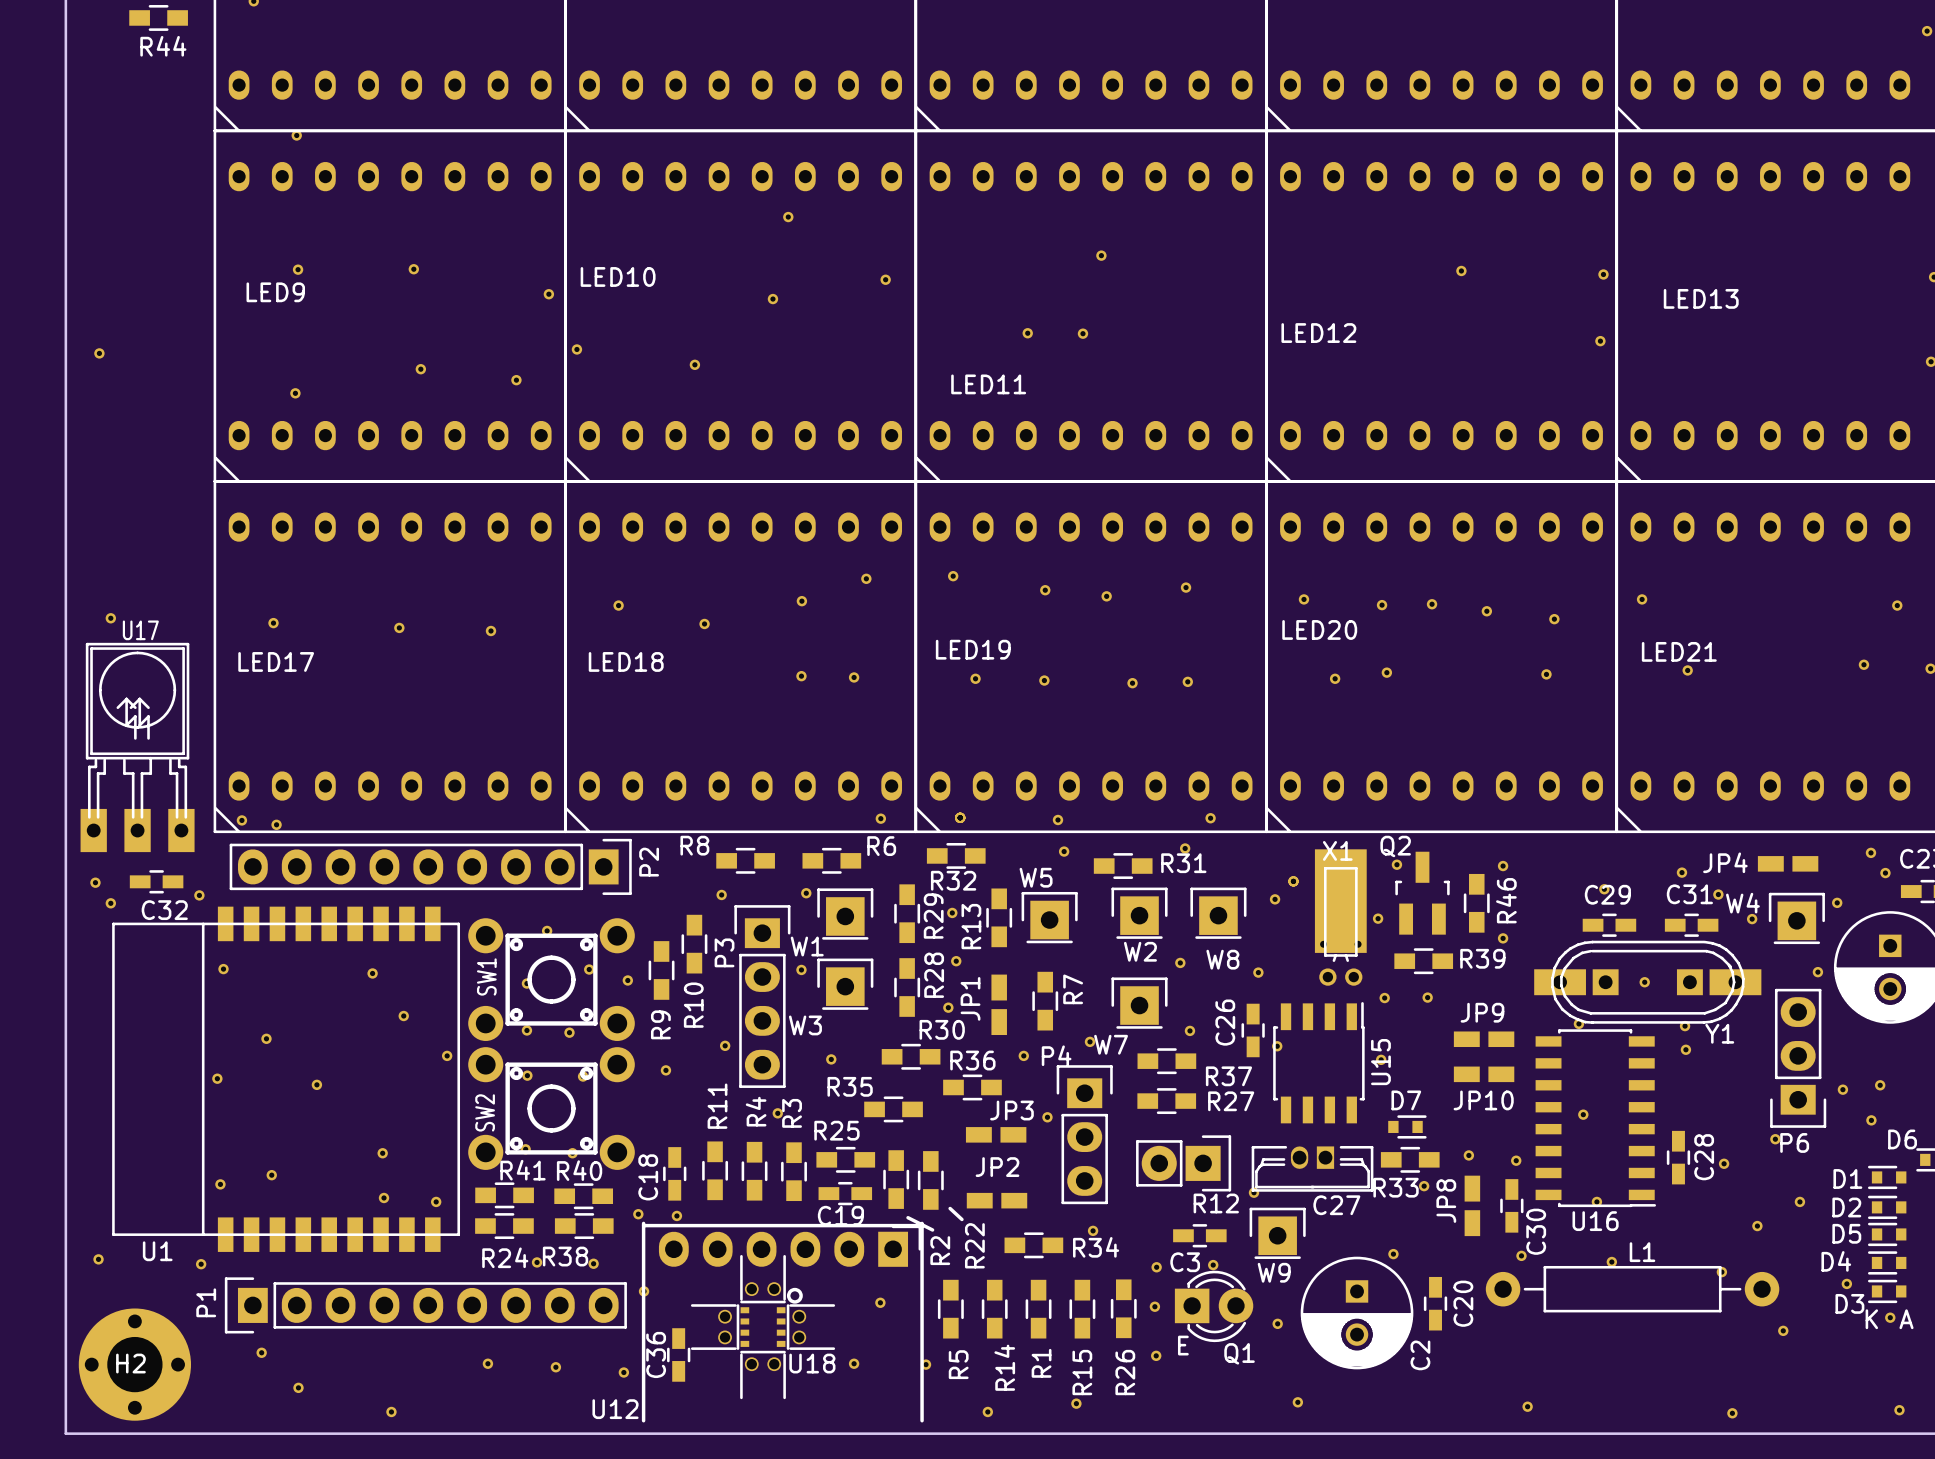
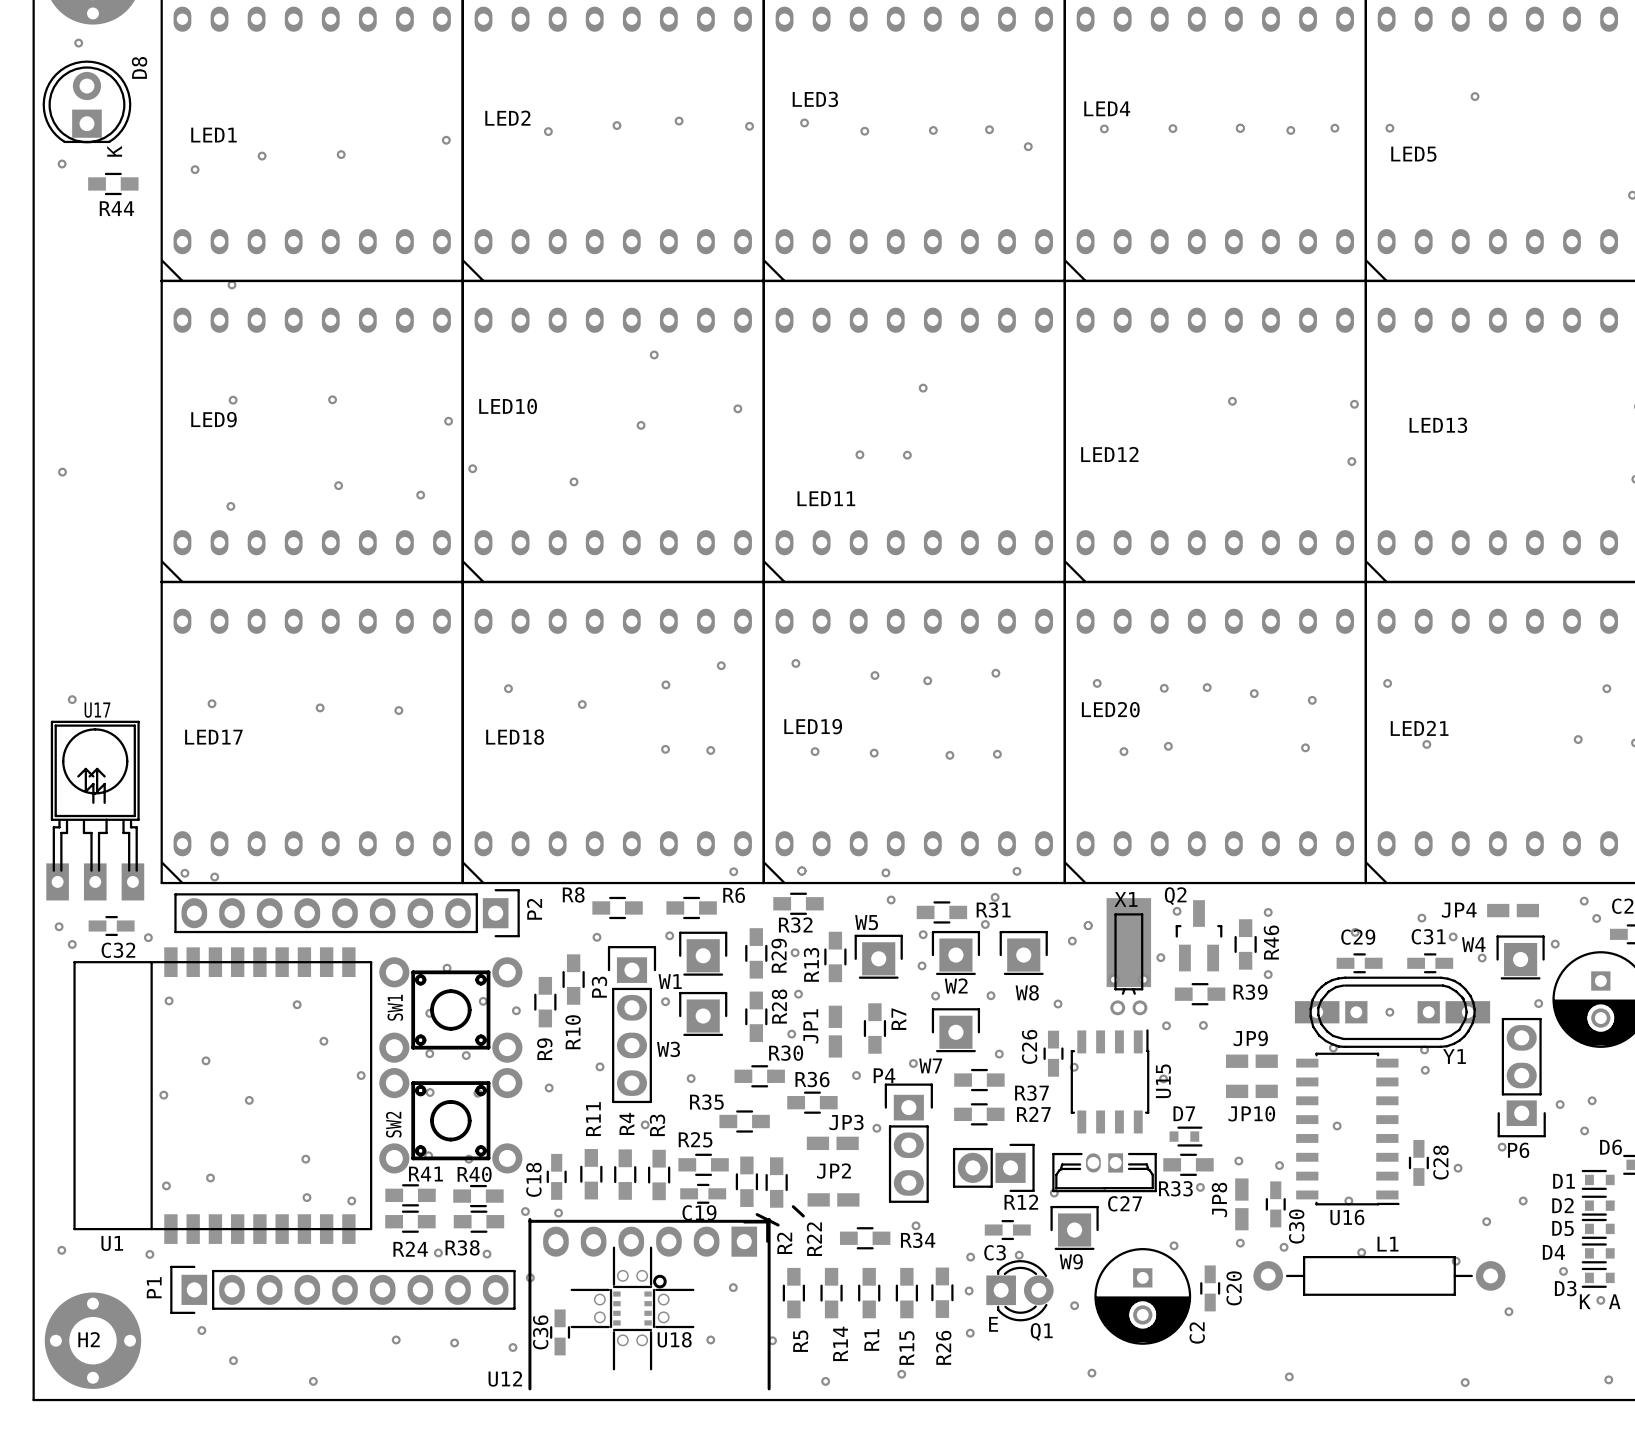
part: none -> (985, 924)
part: none -> (923, 934)
part: none -> (922, 965)
part: none -> (935, 996)
part: none -> (1240, 1243)

